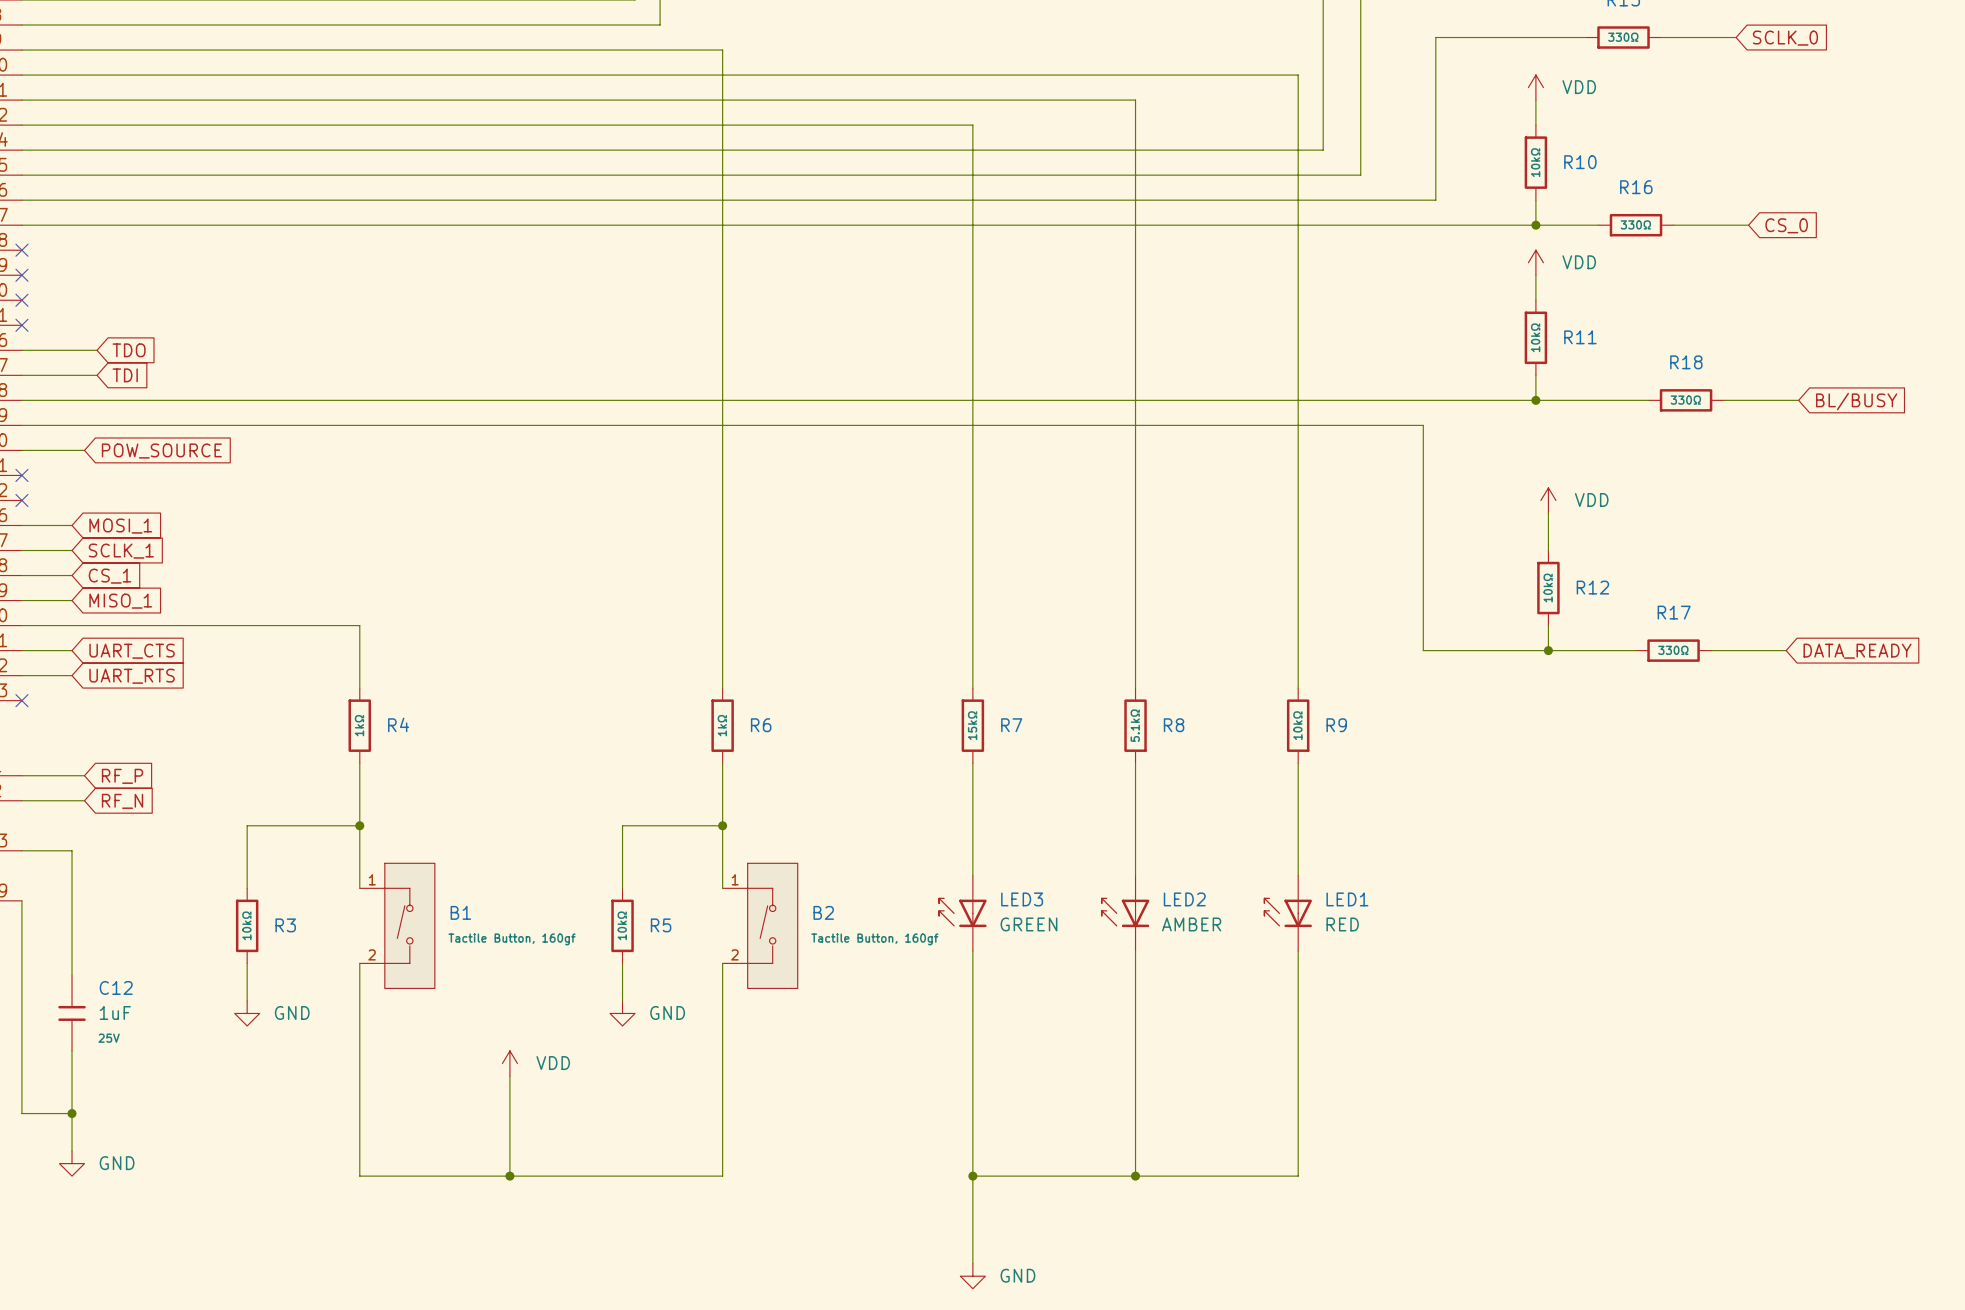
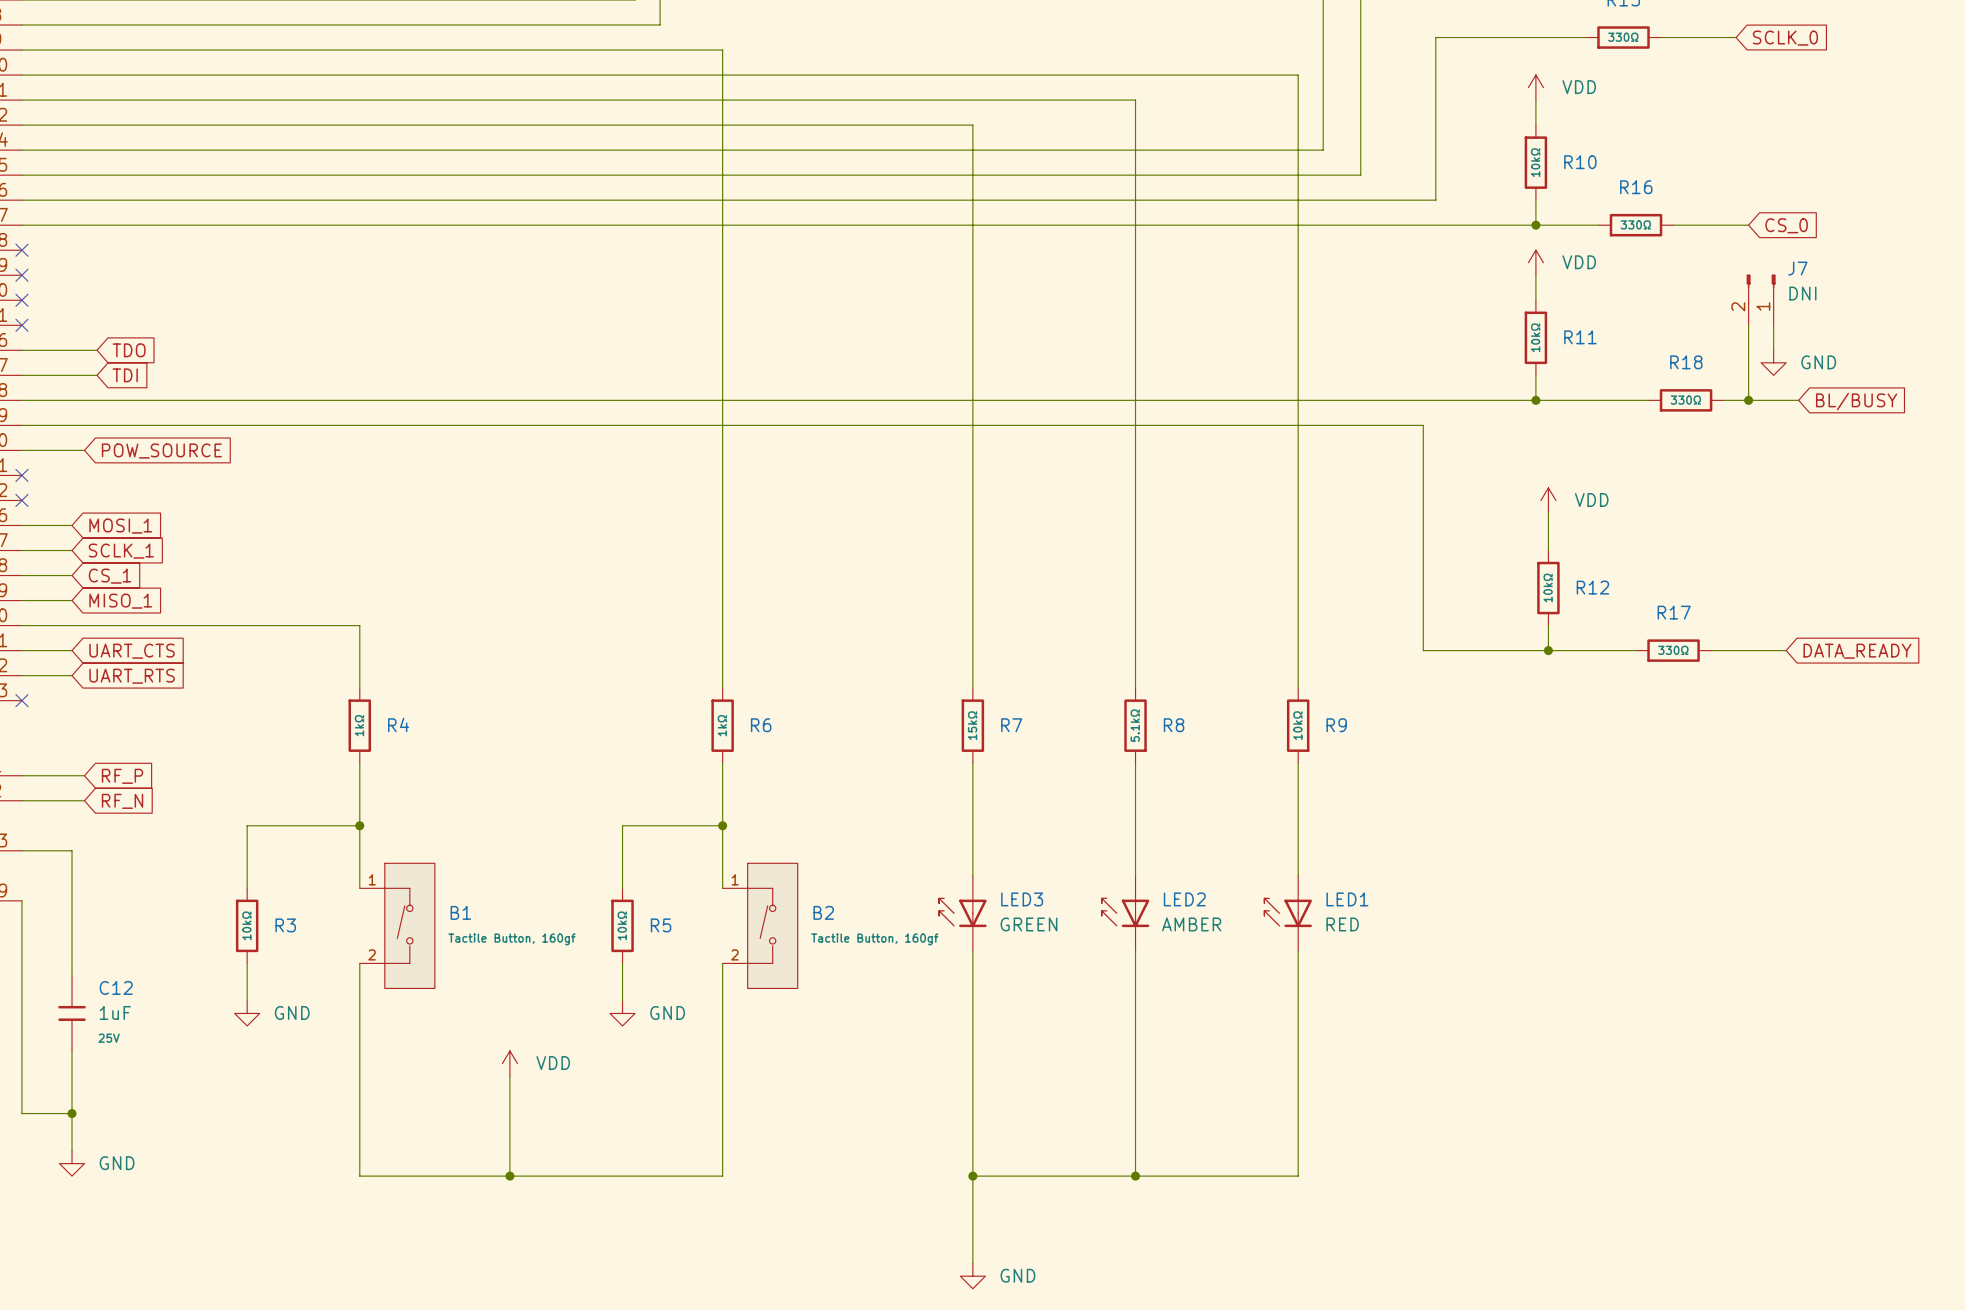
J7: none -> DNI (1761, 299)
wire: none -> (1748, 325) (1748, 400)
wire: none -> (1773, 325) (1773, 350)
power symbol: none -> GND (1773, 362)
junction: none -> (1748, 400)

